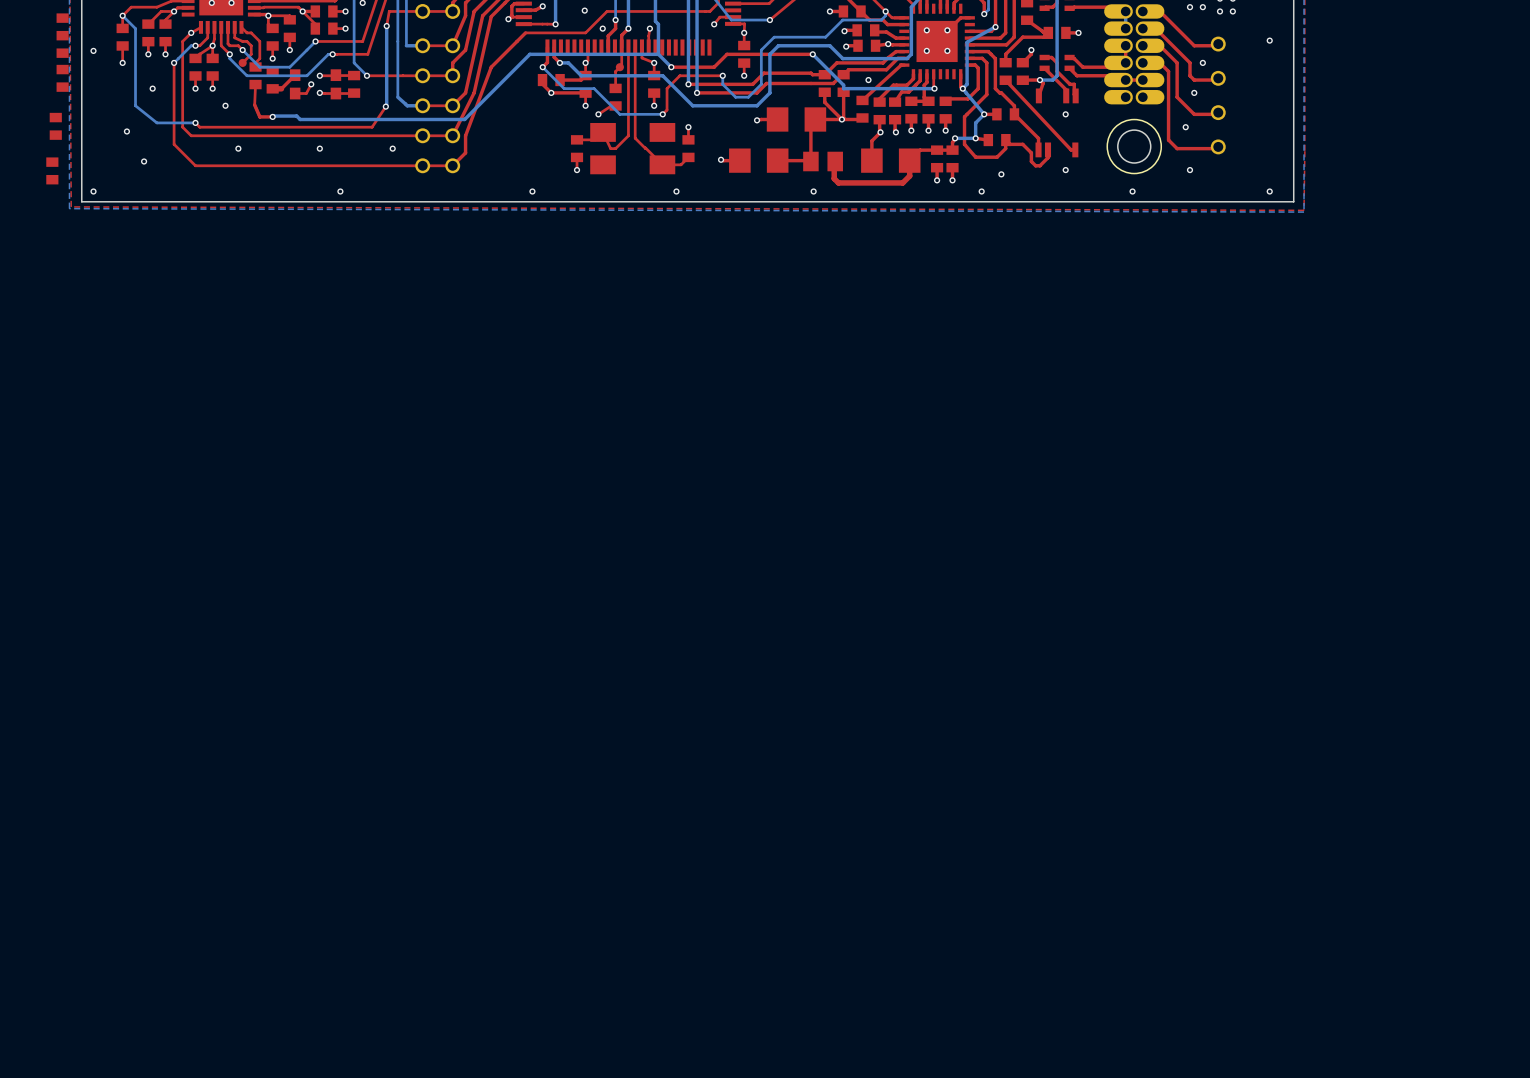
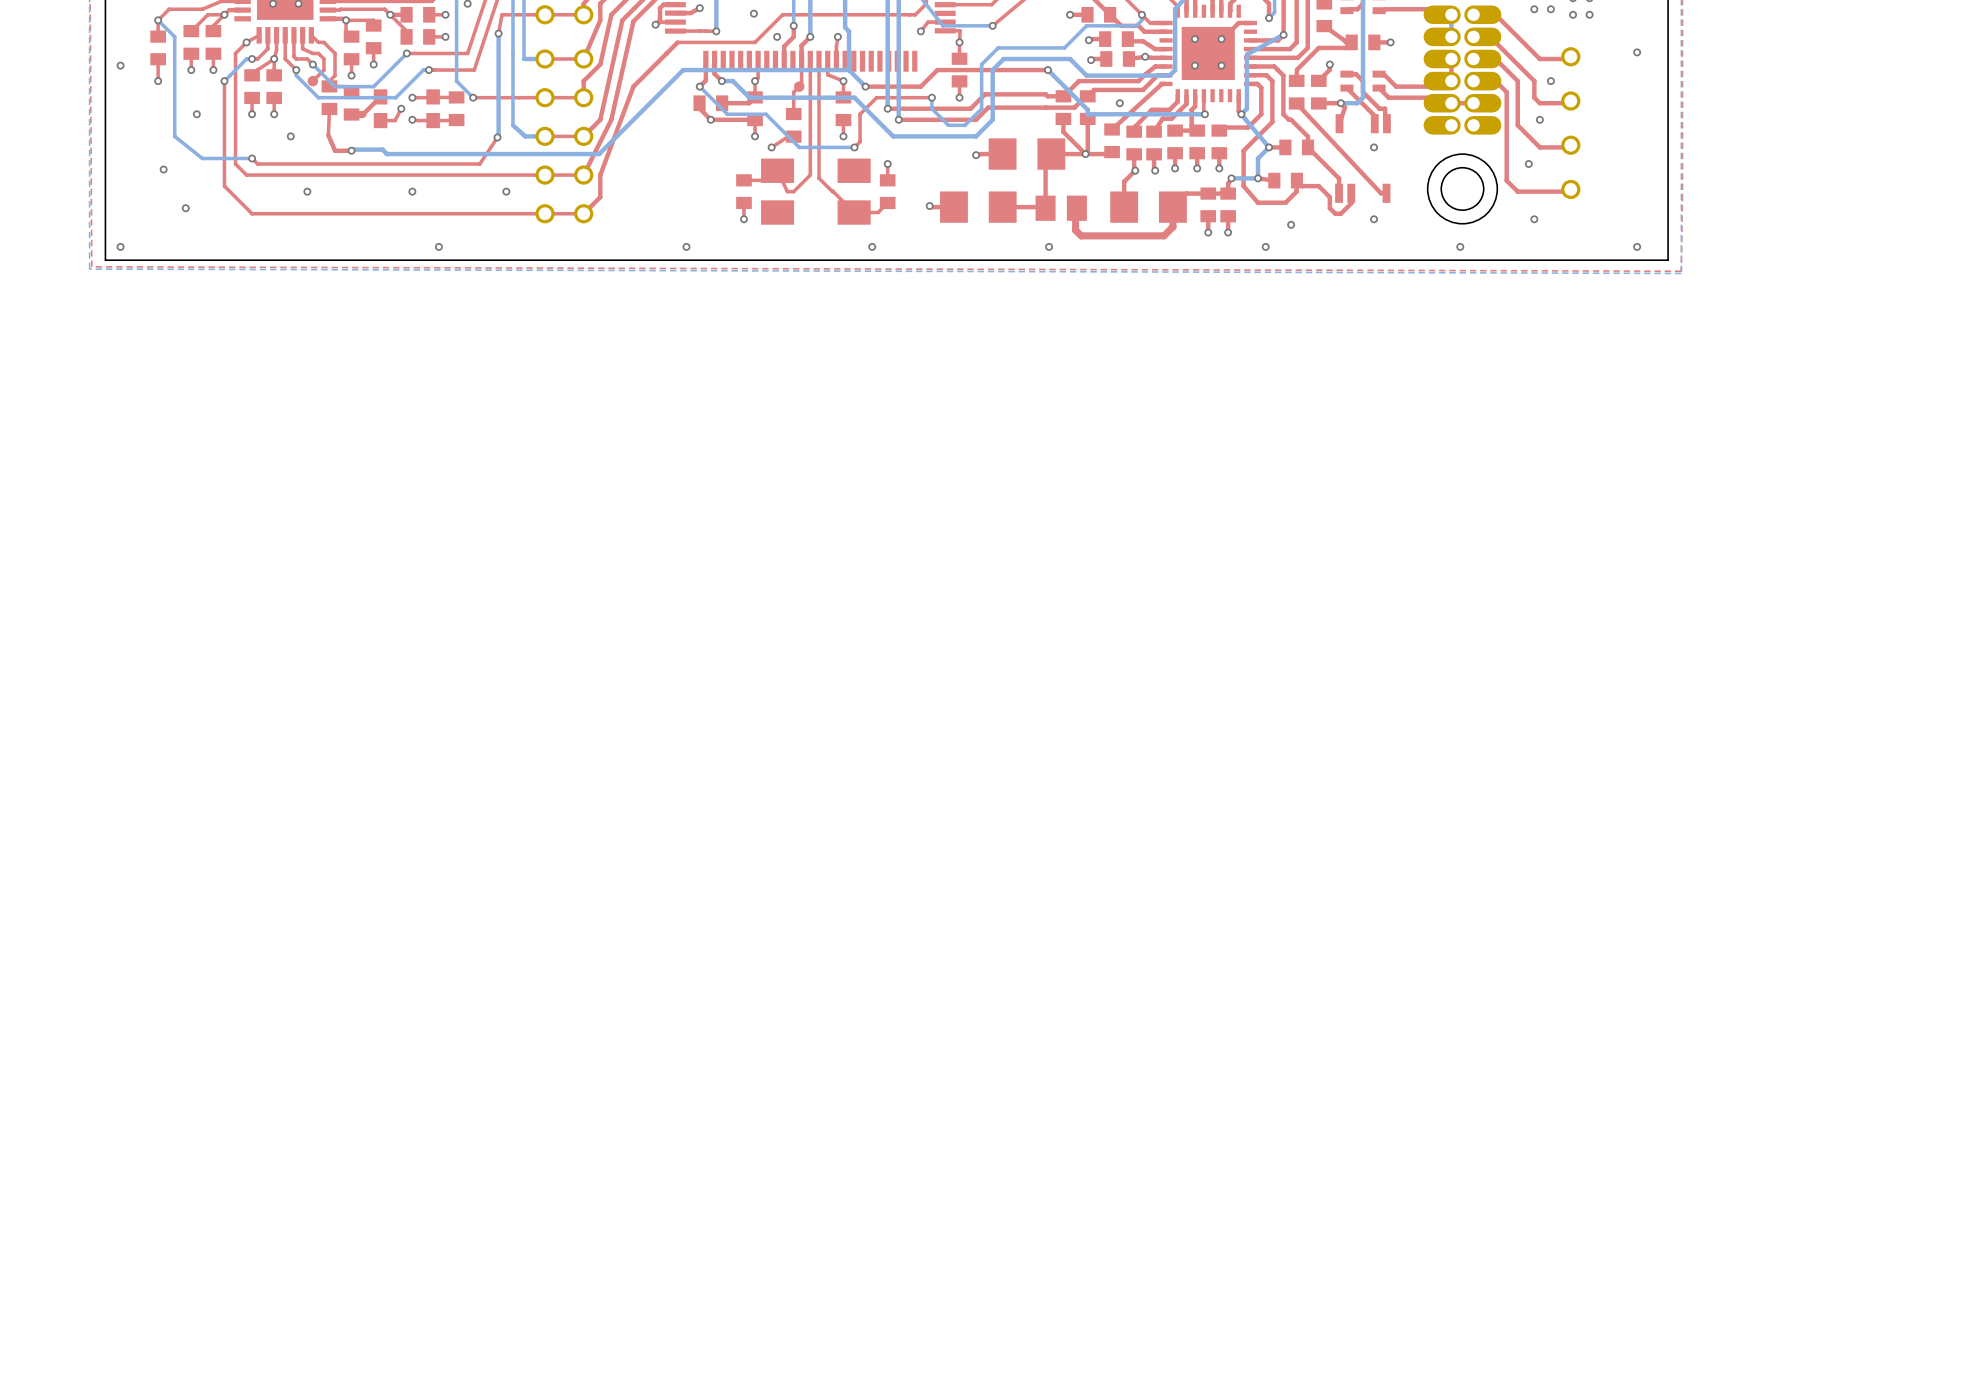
part: (62, 35) -> none
part: (62, 78) -> none
part: (55, 126) -> none
part: (52, 170) -> none

